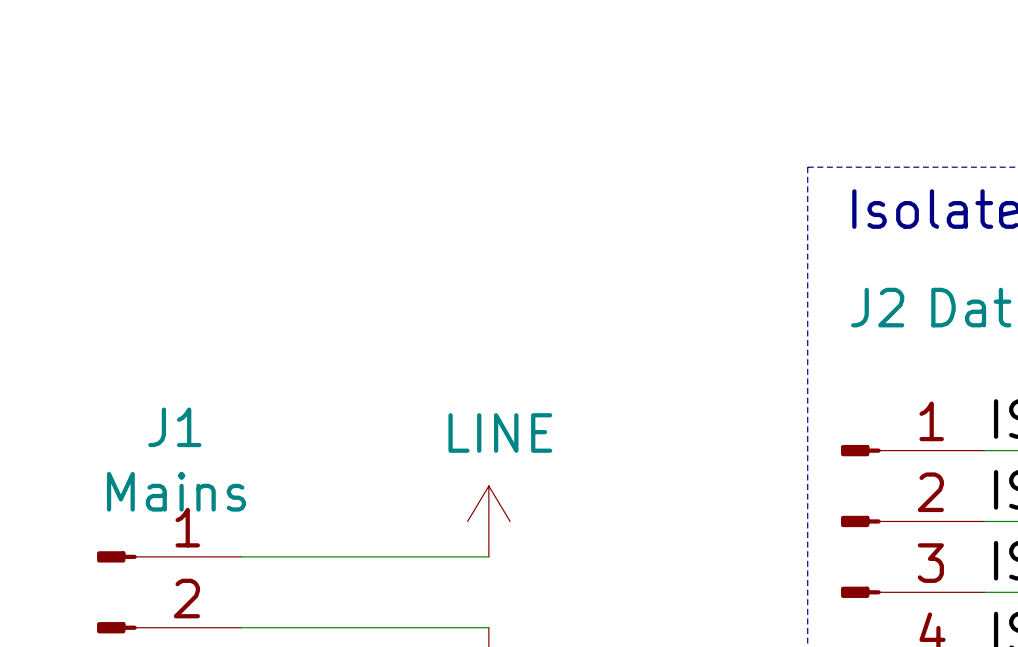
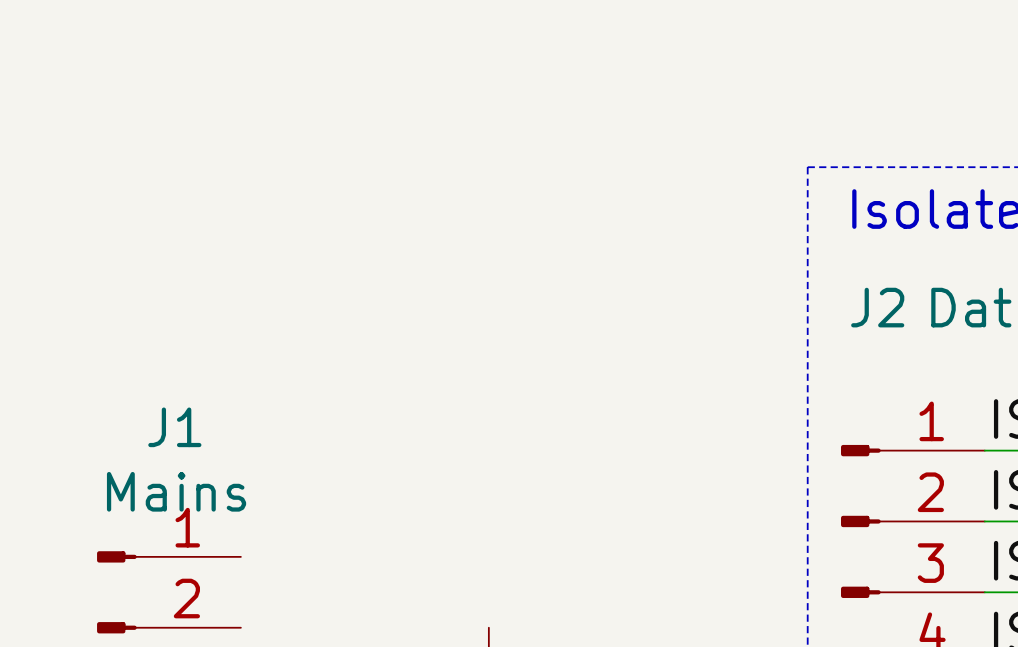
power symbol: LINE (488, 521) -> none
wire: (240, 556) (488, 556) -> none
wire: (240, 627) (488, 627) -> none

